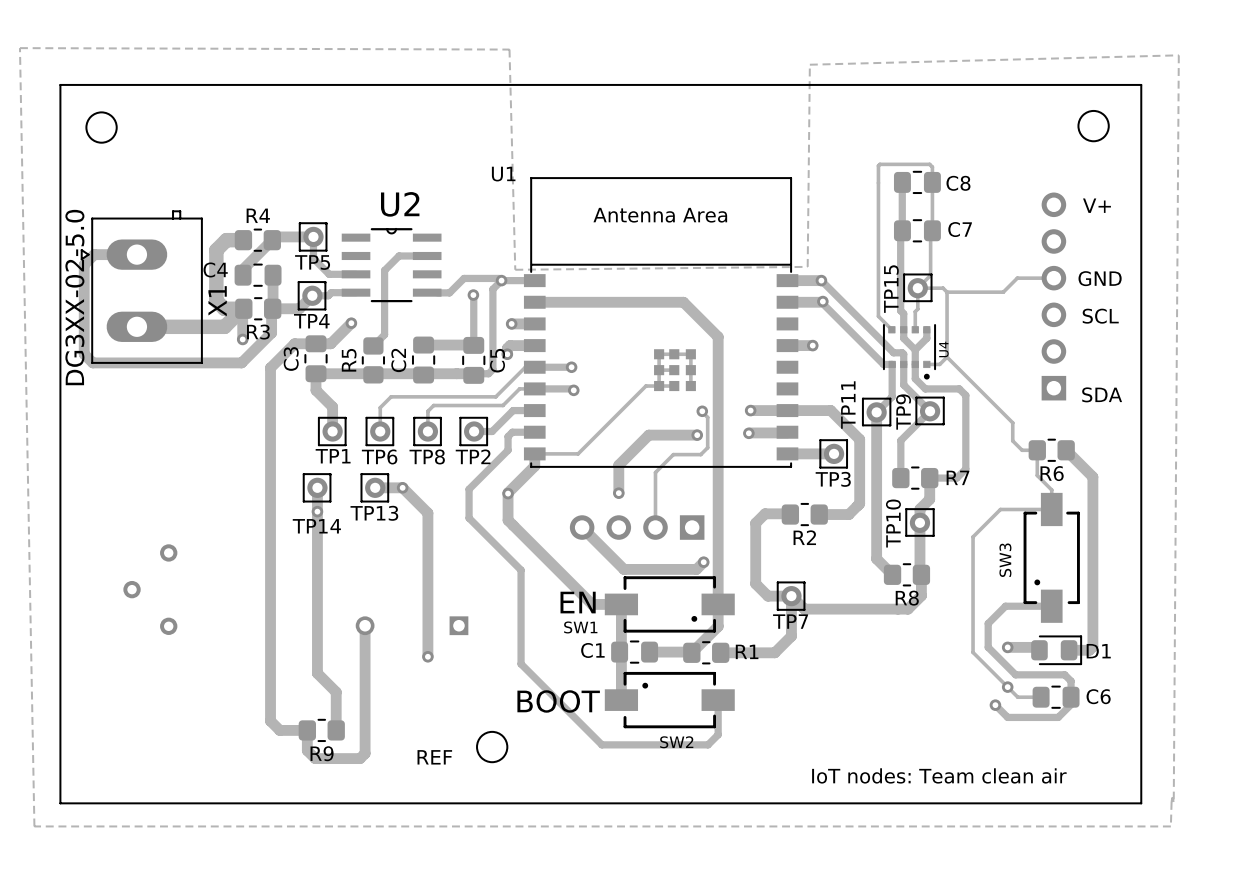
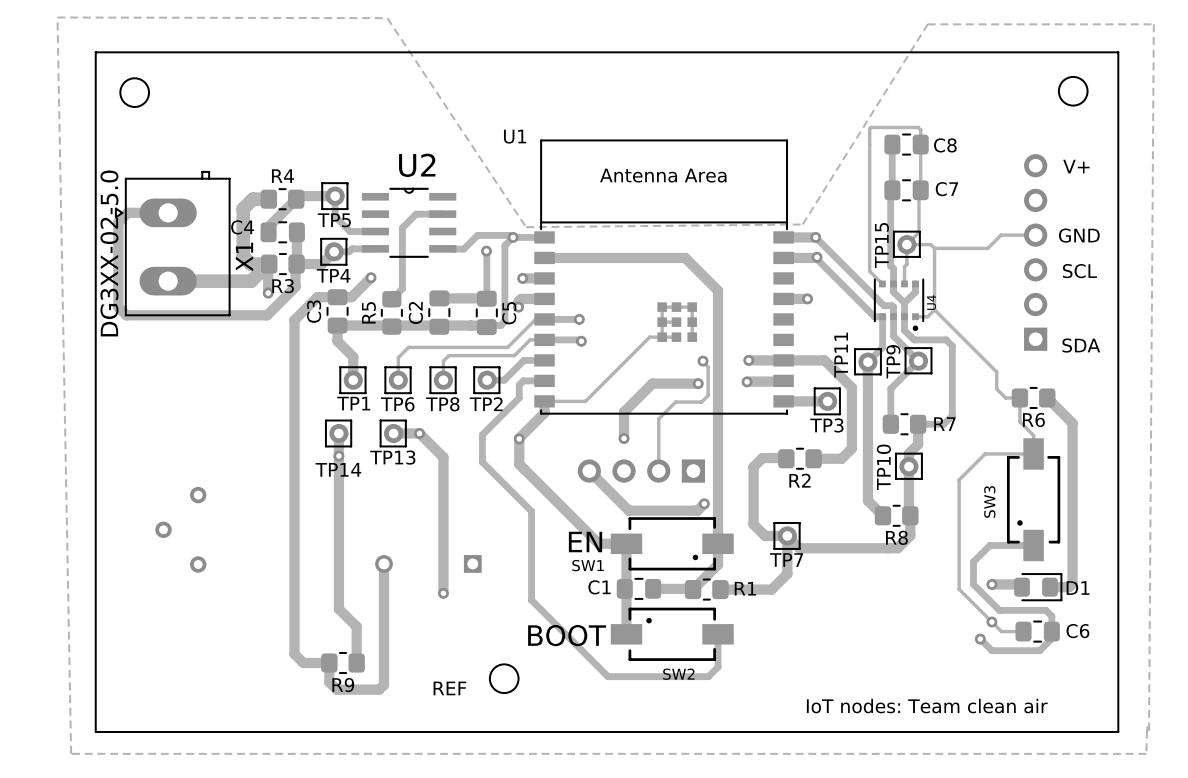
zone outline: (19, 48) (509, 49) (515, 269) -> (57, 17) (387, 18) (526, 227)
zone outline: (1178, 55) (809, 64) (807, 266) -> (1153, 24) (927, 24) (802, 224)

